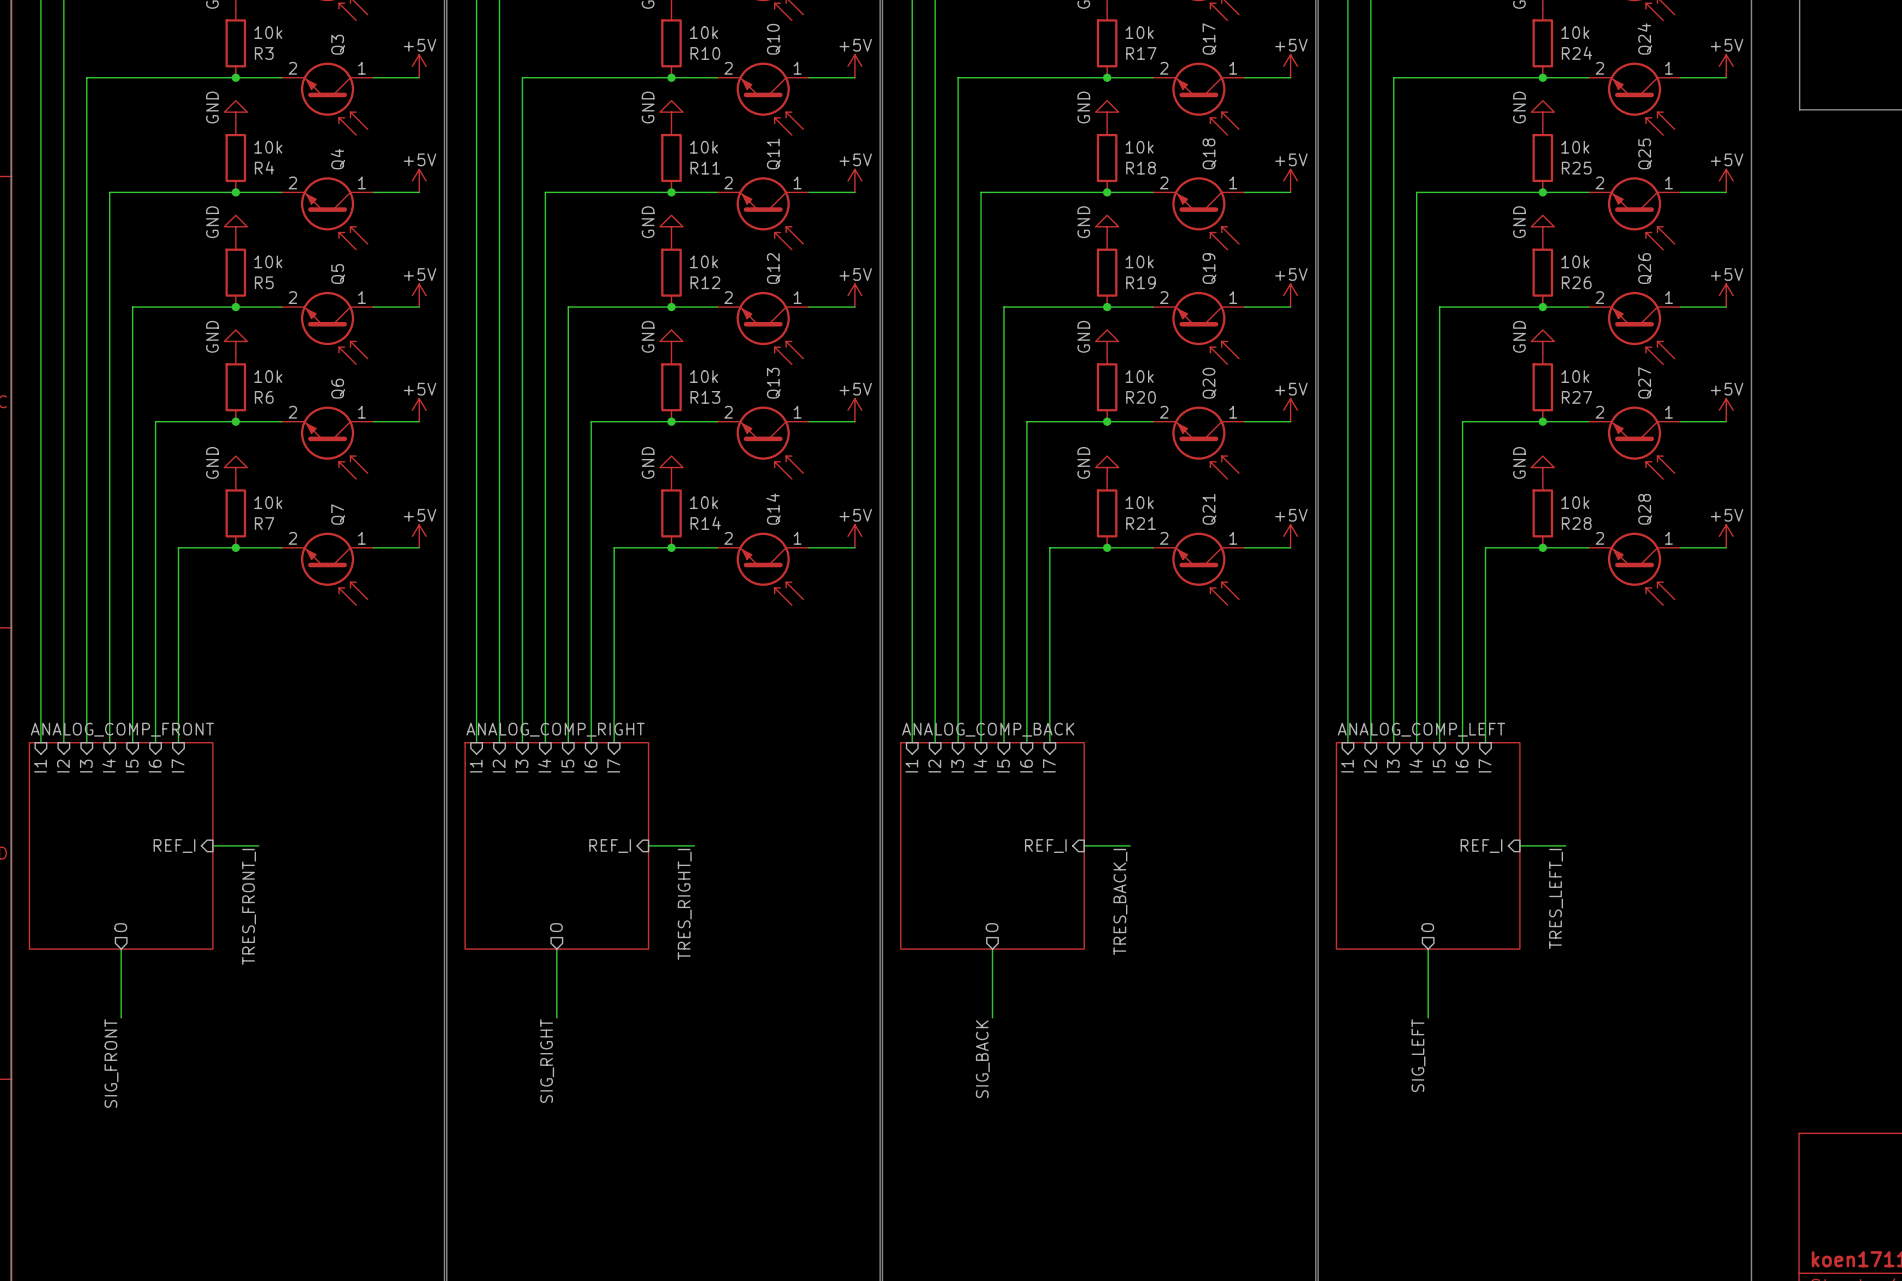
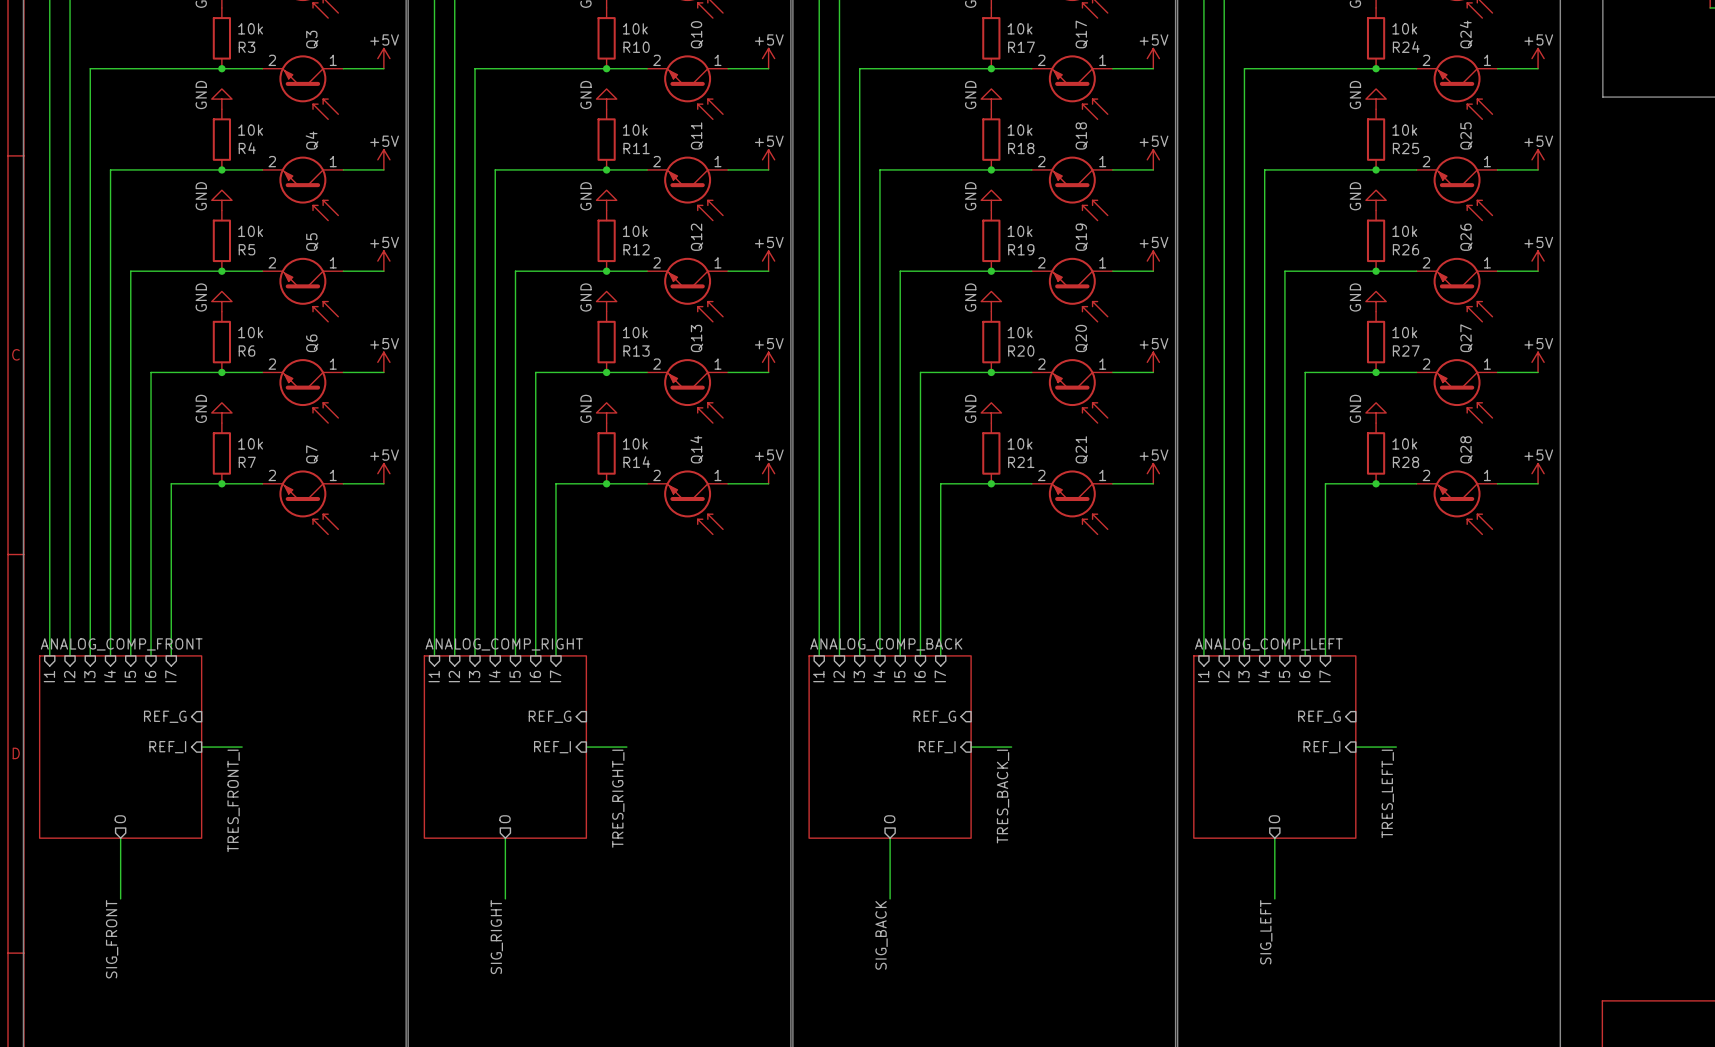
sheet pin: none -> REF_G (165, 716)
sheet pin: none -> REF_G (550, 716)
sheet pin: none -> REF_G (934, 716)
sheet pin: none -> REF_G (1319, 716)

